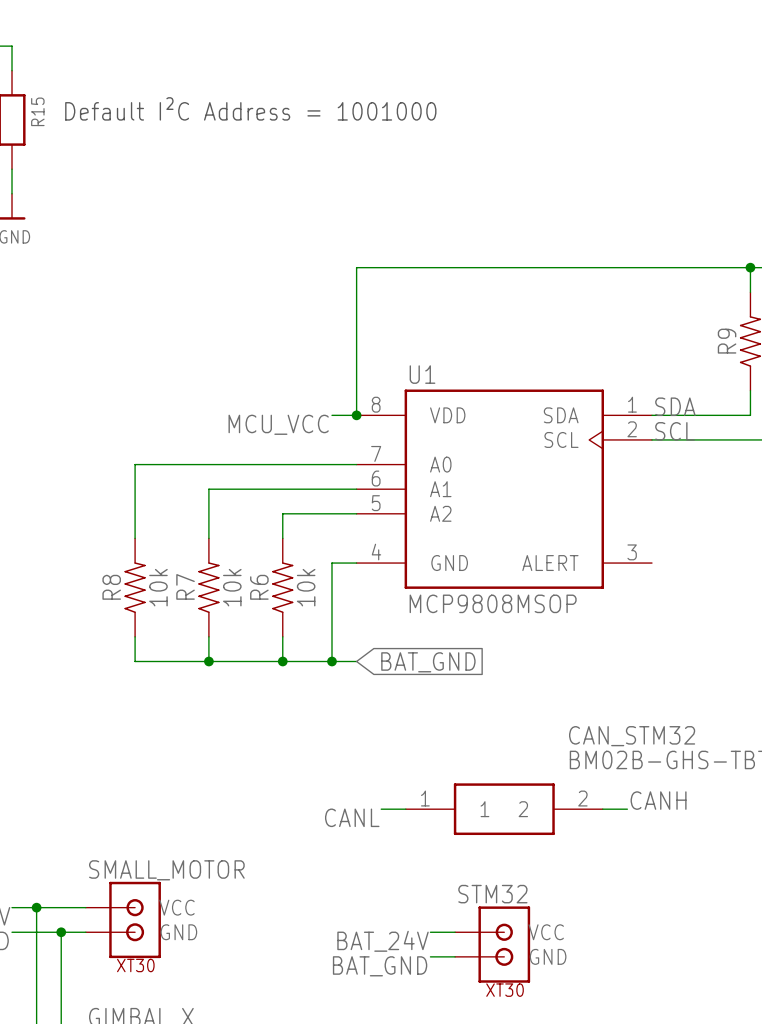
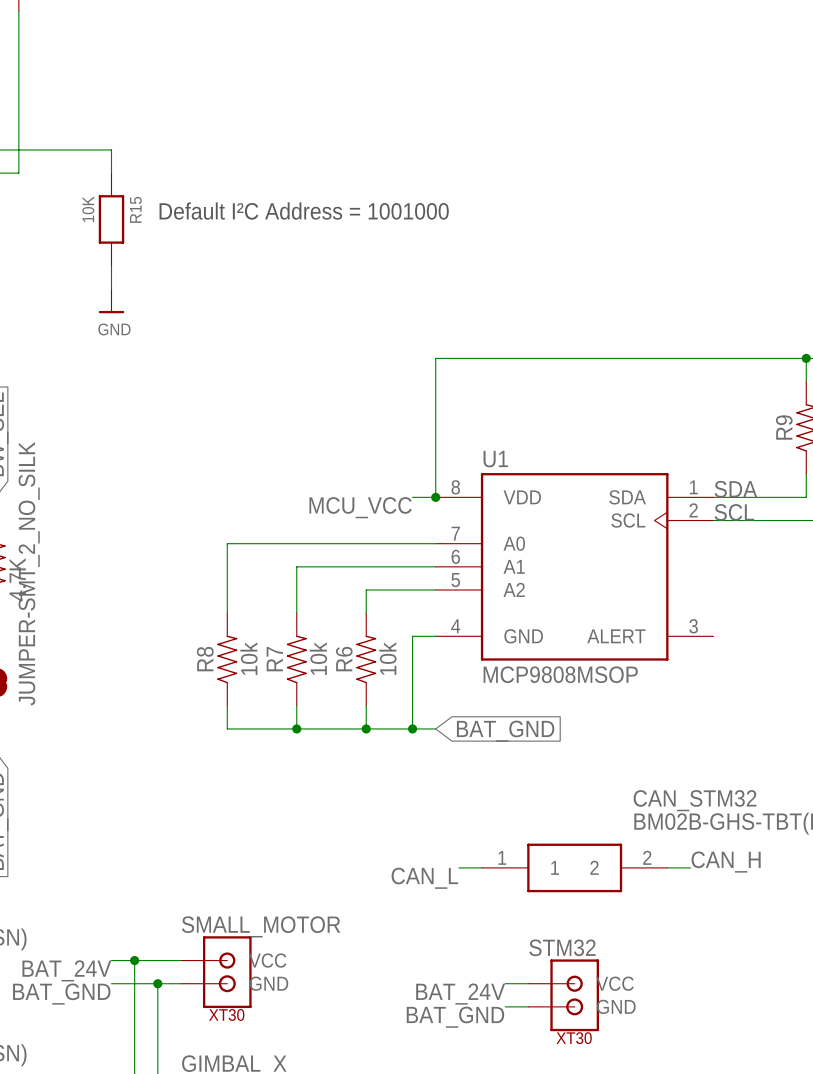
label: CANH (658, 800) -> CAN_H (726, 862)
label: CANL (352, 817) -> CAN_L (424, 878)

